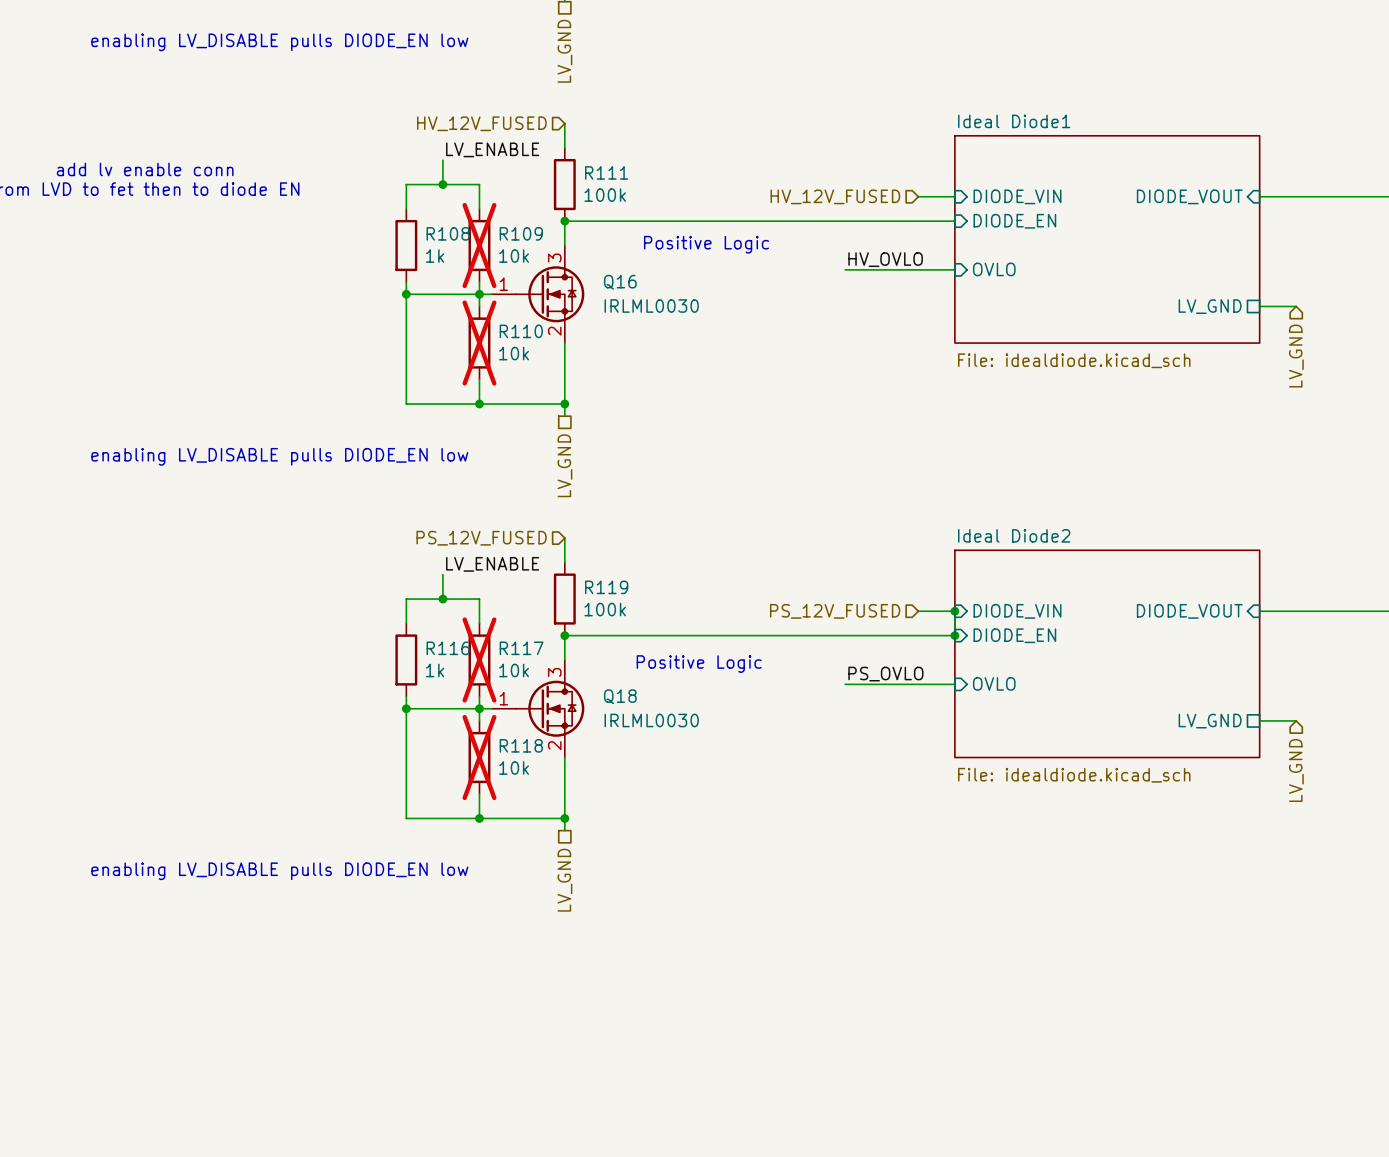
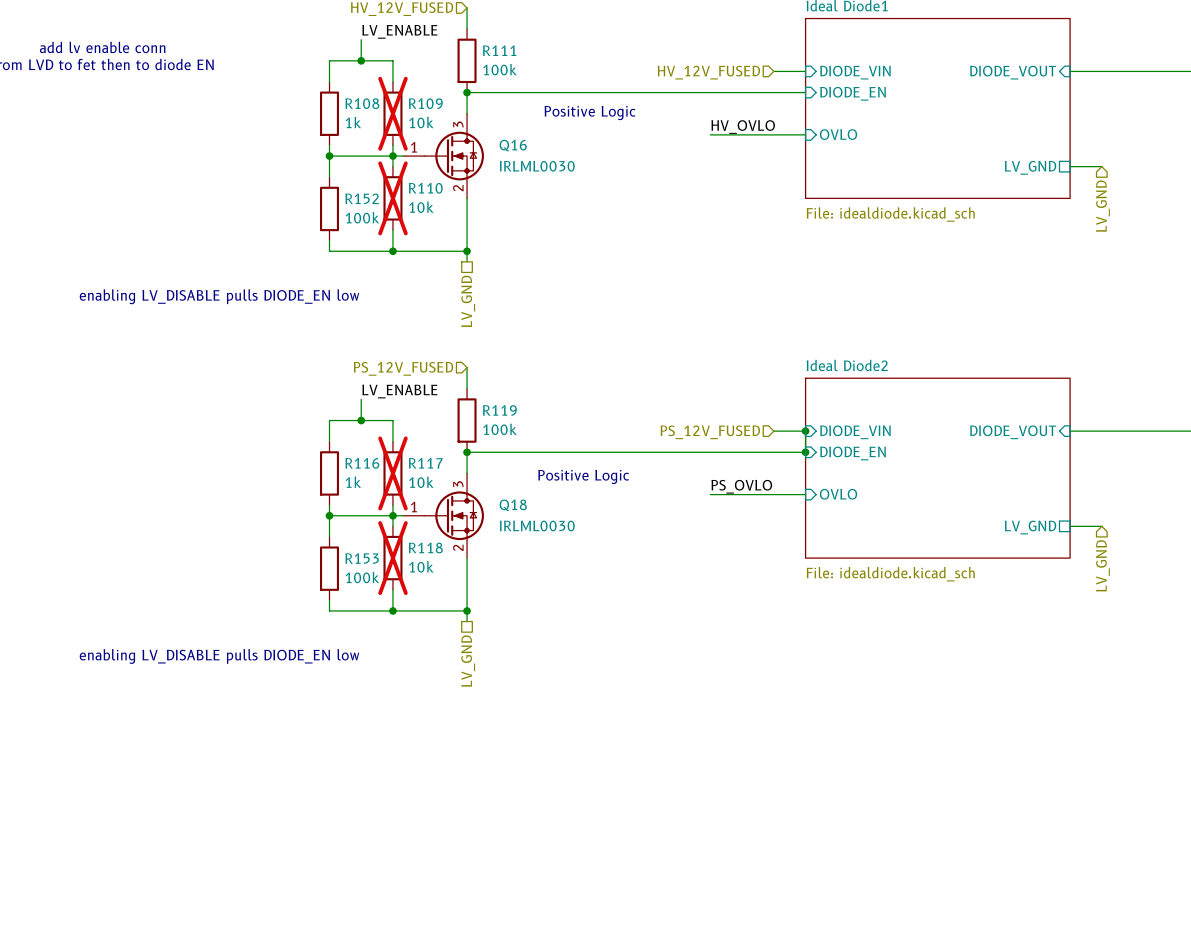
wire: (406, 318) (406, 391) -> none
R152: none -> 100k (329, 208)
wire: (406, 733) (406, 806) -> none
R153: none -> 100k (329, 568)

